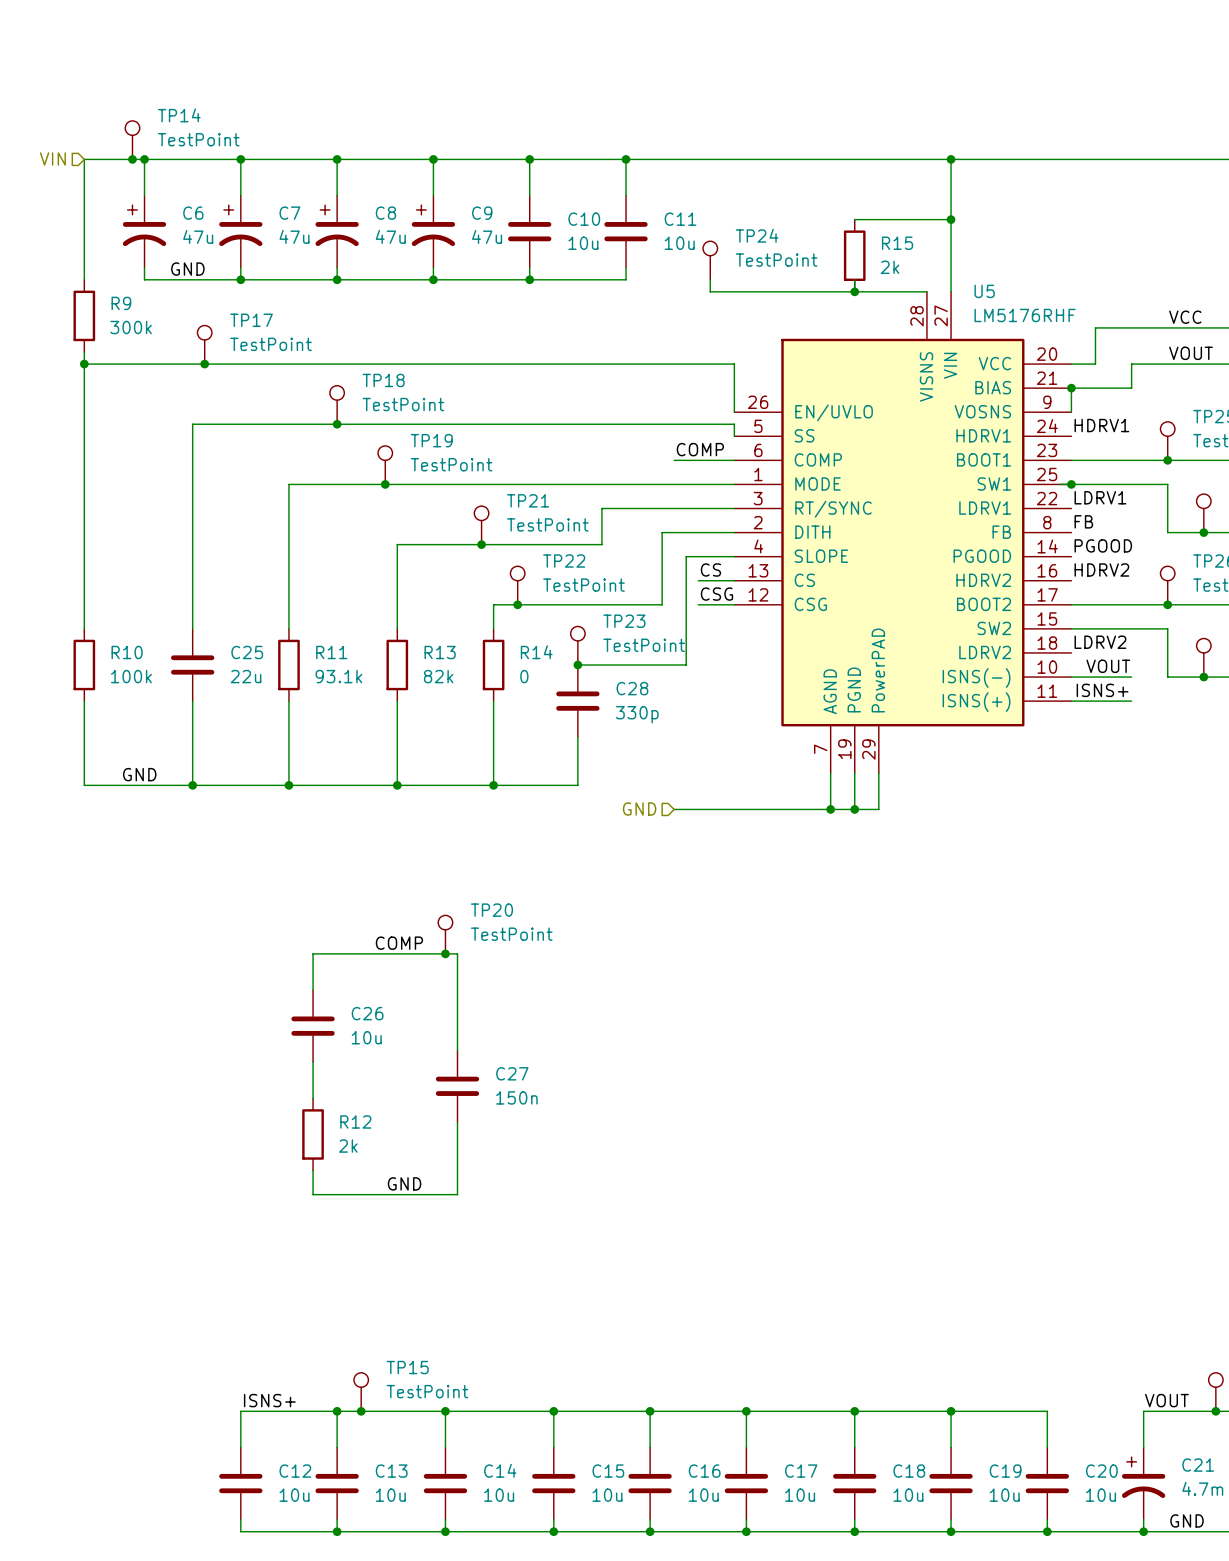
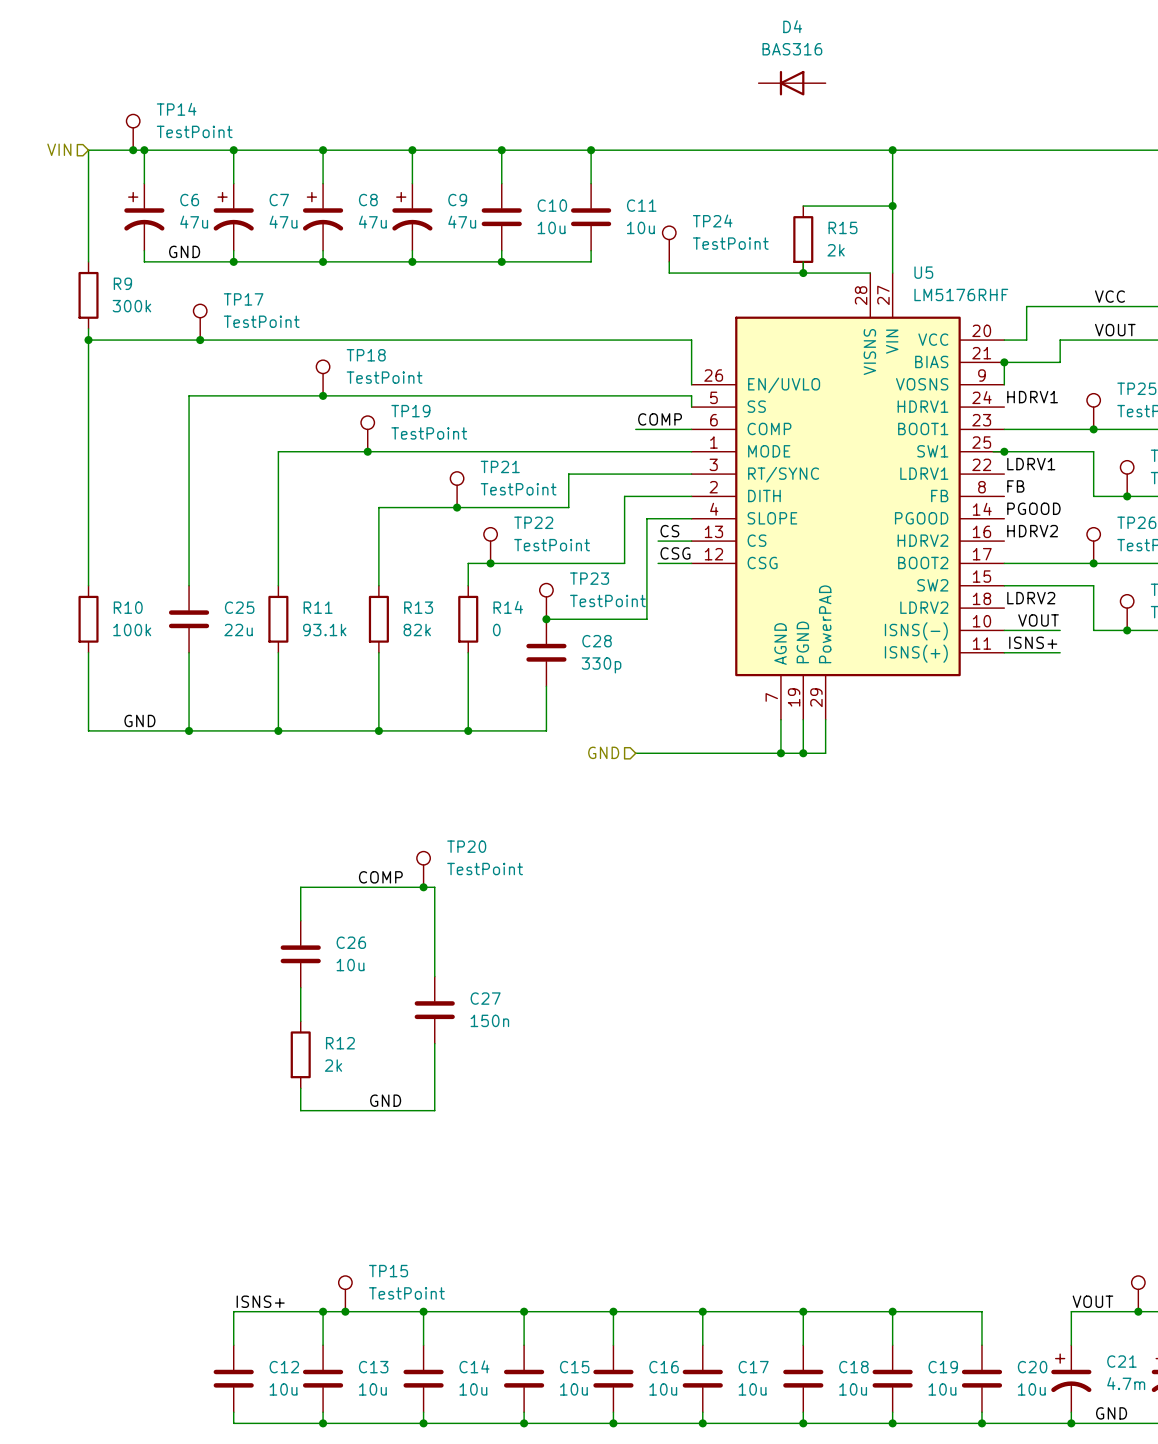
D4: none -> BAS316 (792, 83)

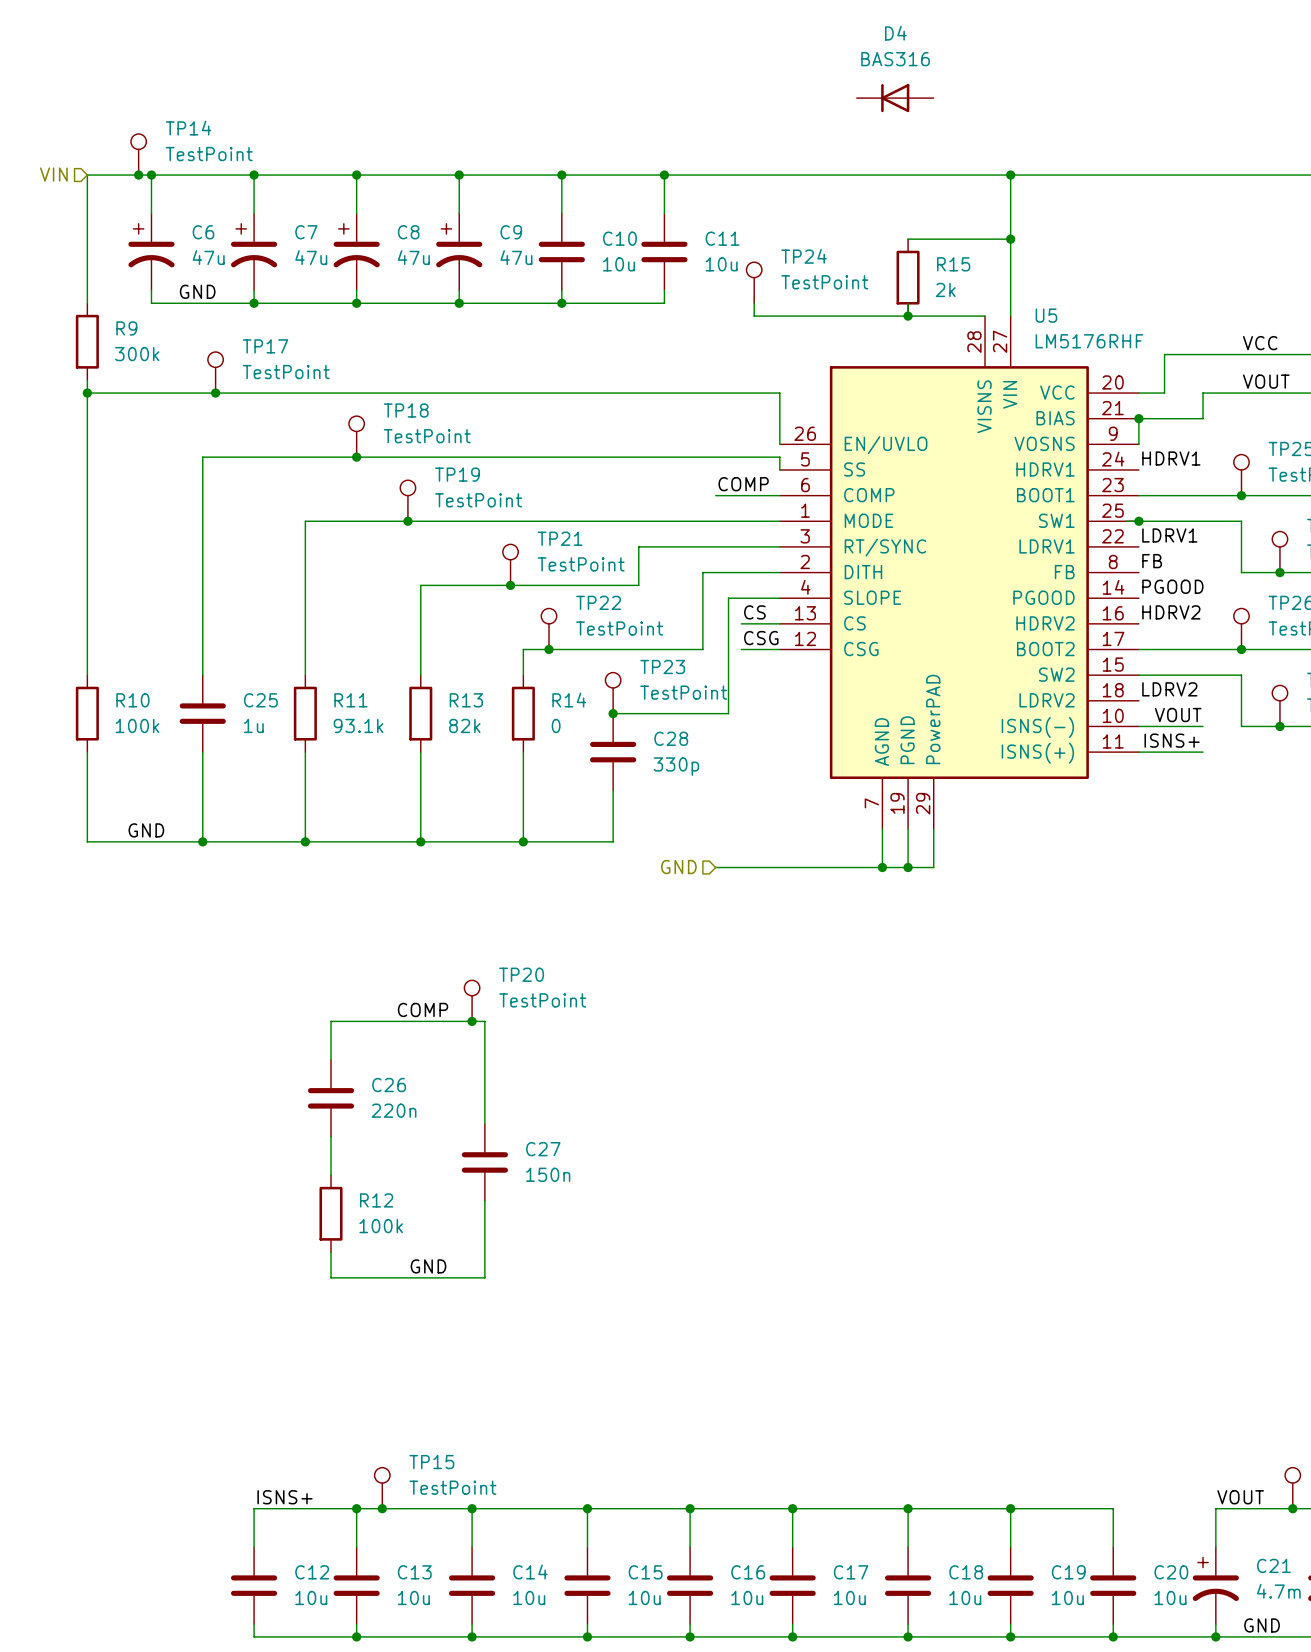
C25 value: 22u (238, 630) -> 1u (253, 725)
C26 value: 10u (350, 965) -> 220n (394, 1110)
R12 value: 2k (333, 1065) -> 100k (381, 1226)

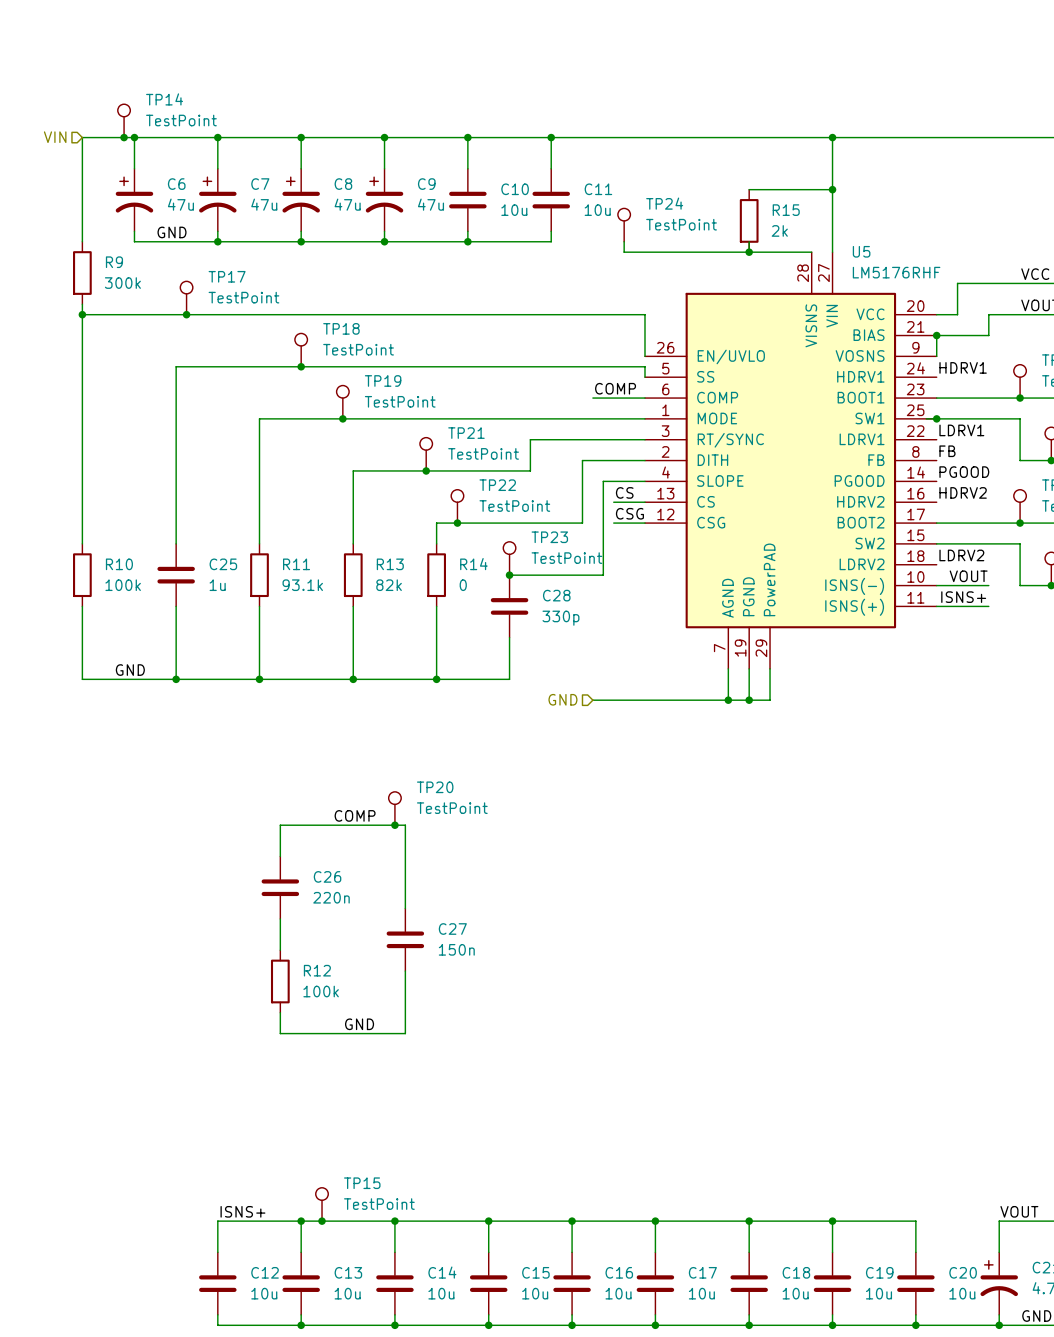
D4: BAS316 (895, 98) -> none

